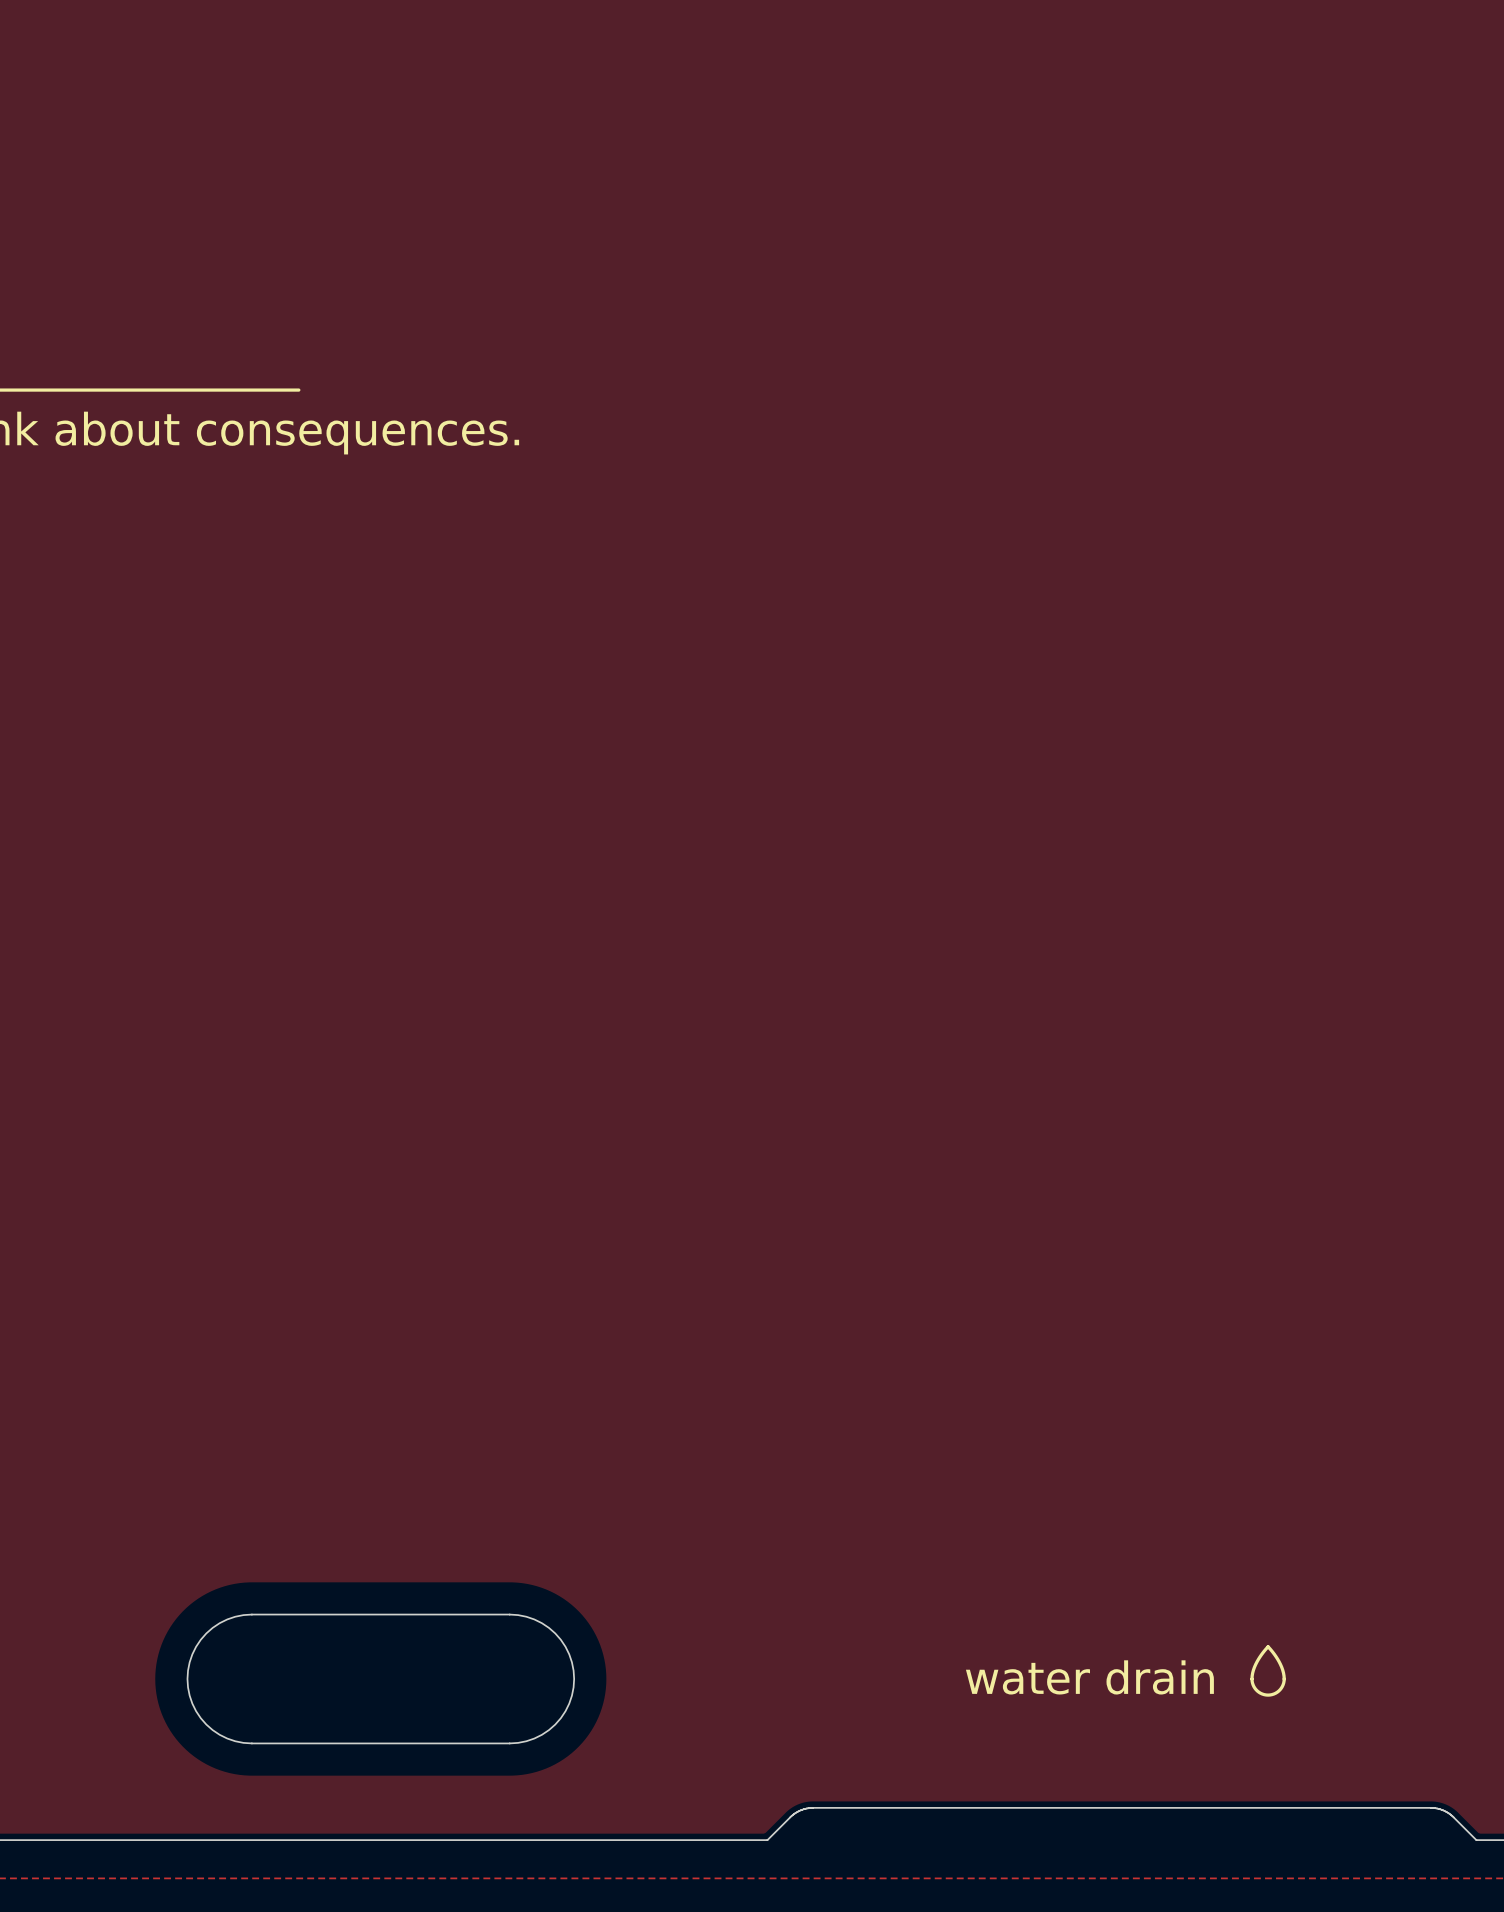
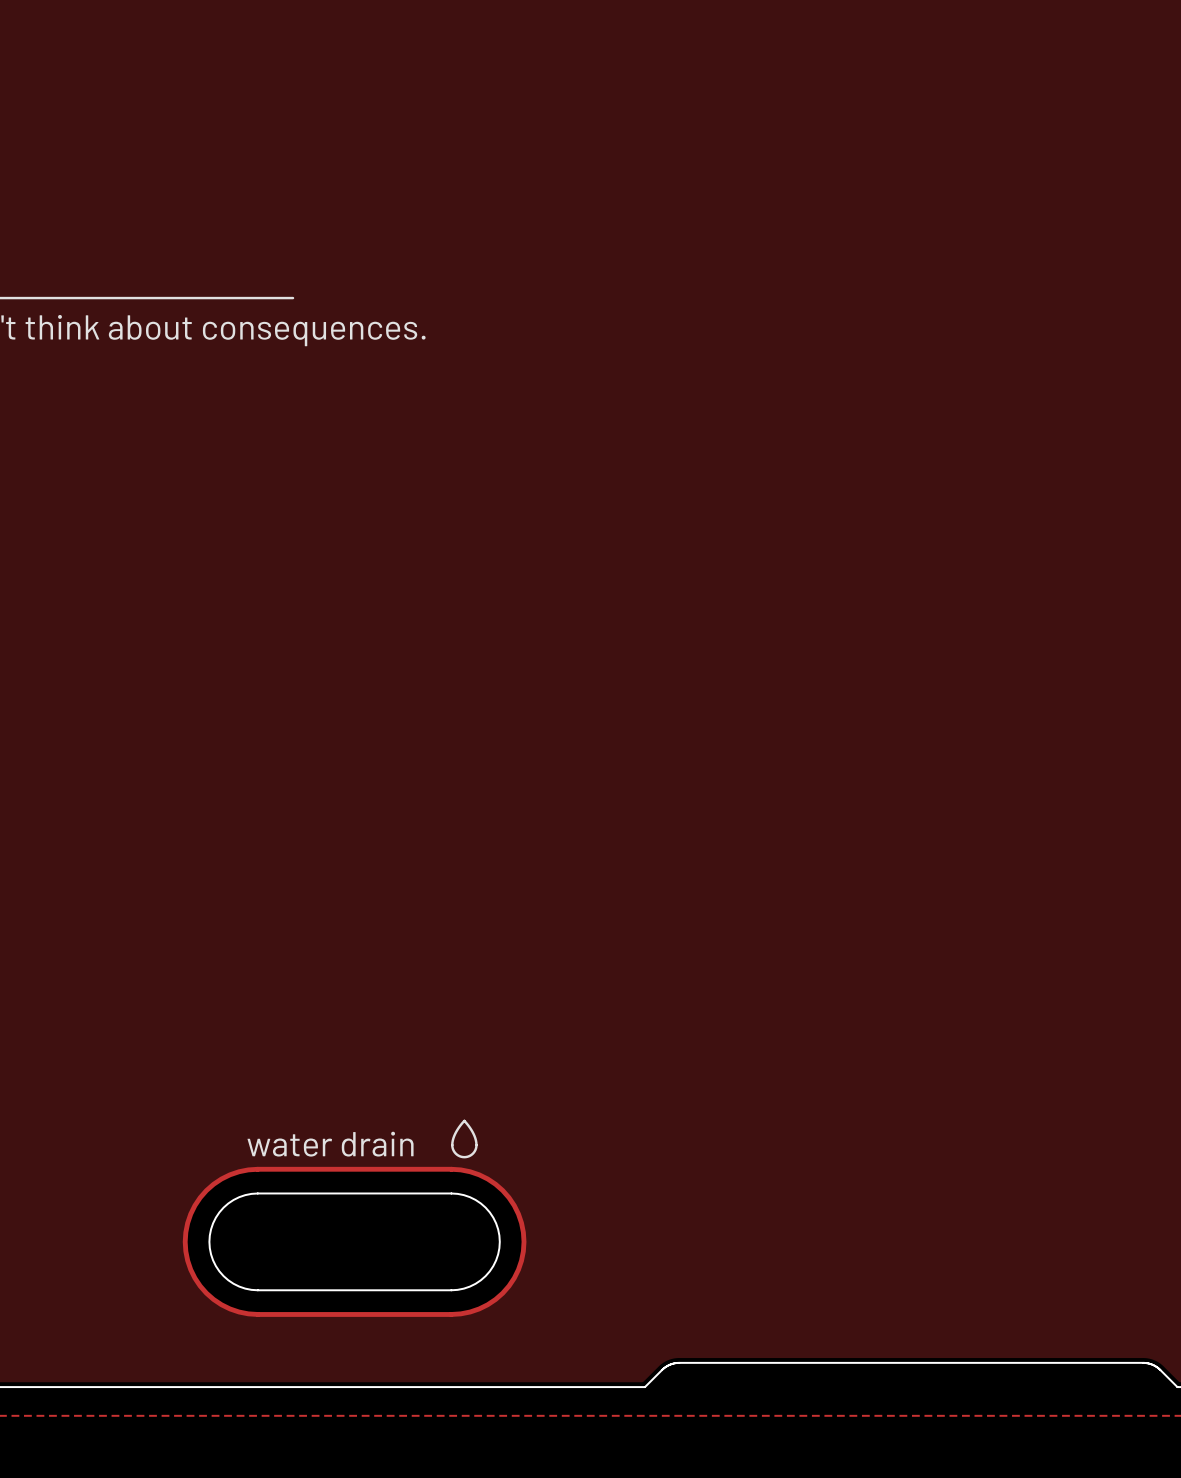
line: none -> (464, 1120) (473, 1134) (476, 1145) (472, 1153) (464, 1157) (455, 1153) (452, 1145) (455, 1134) (464, 1120)
text: none -> water drain (330, 1144)
track: none -> (257, 1169) (451, 1169) (479, 1174) (502, 1190) (518, 1214) (524, 1241) (518, 1269) (509, 1286) (495, 1299) (479, 1308) (460, 1313) (257, 1314) (230, 1308) (206, 1293) (194, 1278) (185, 1251) (185, 1232) (190, 1214) (206, 1190) (230, 1174) (257, 1169)
board edge: none -> (257, 1193) (451, 1193) (463, 1195) (480, 1203) (493, 1217) (499, 1235) (498, 1254) (493, 1266) (480, 1280) (469, 1286) (457, 1289) (257, 1290) (245, 1288) (228, 1280) (215, 1266) (209, 1248) (209, 1235) (215, 1217) (228, 1203) (239, 1197) (257, 1193)
drawing: [186, 1613, 575, 1745] -> none
drawing: [1250, 1645, 1286, 1697] -> none

